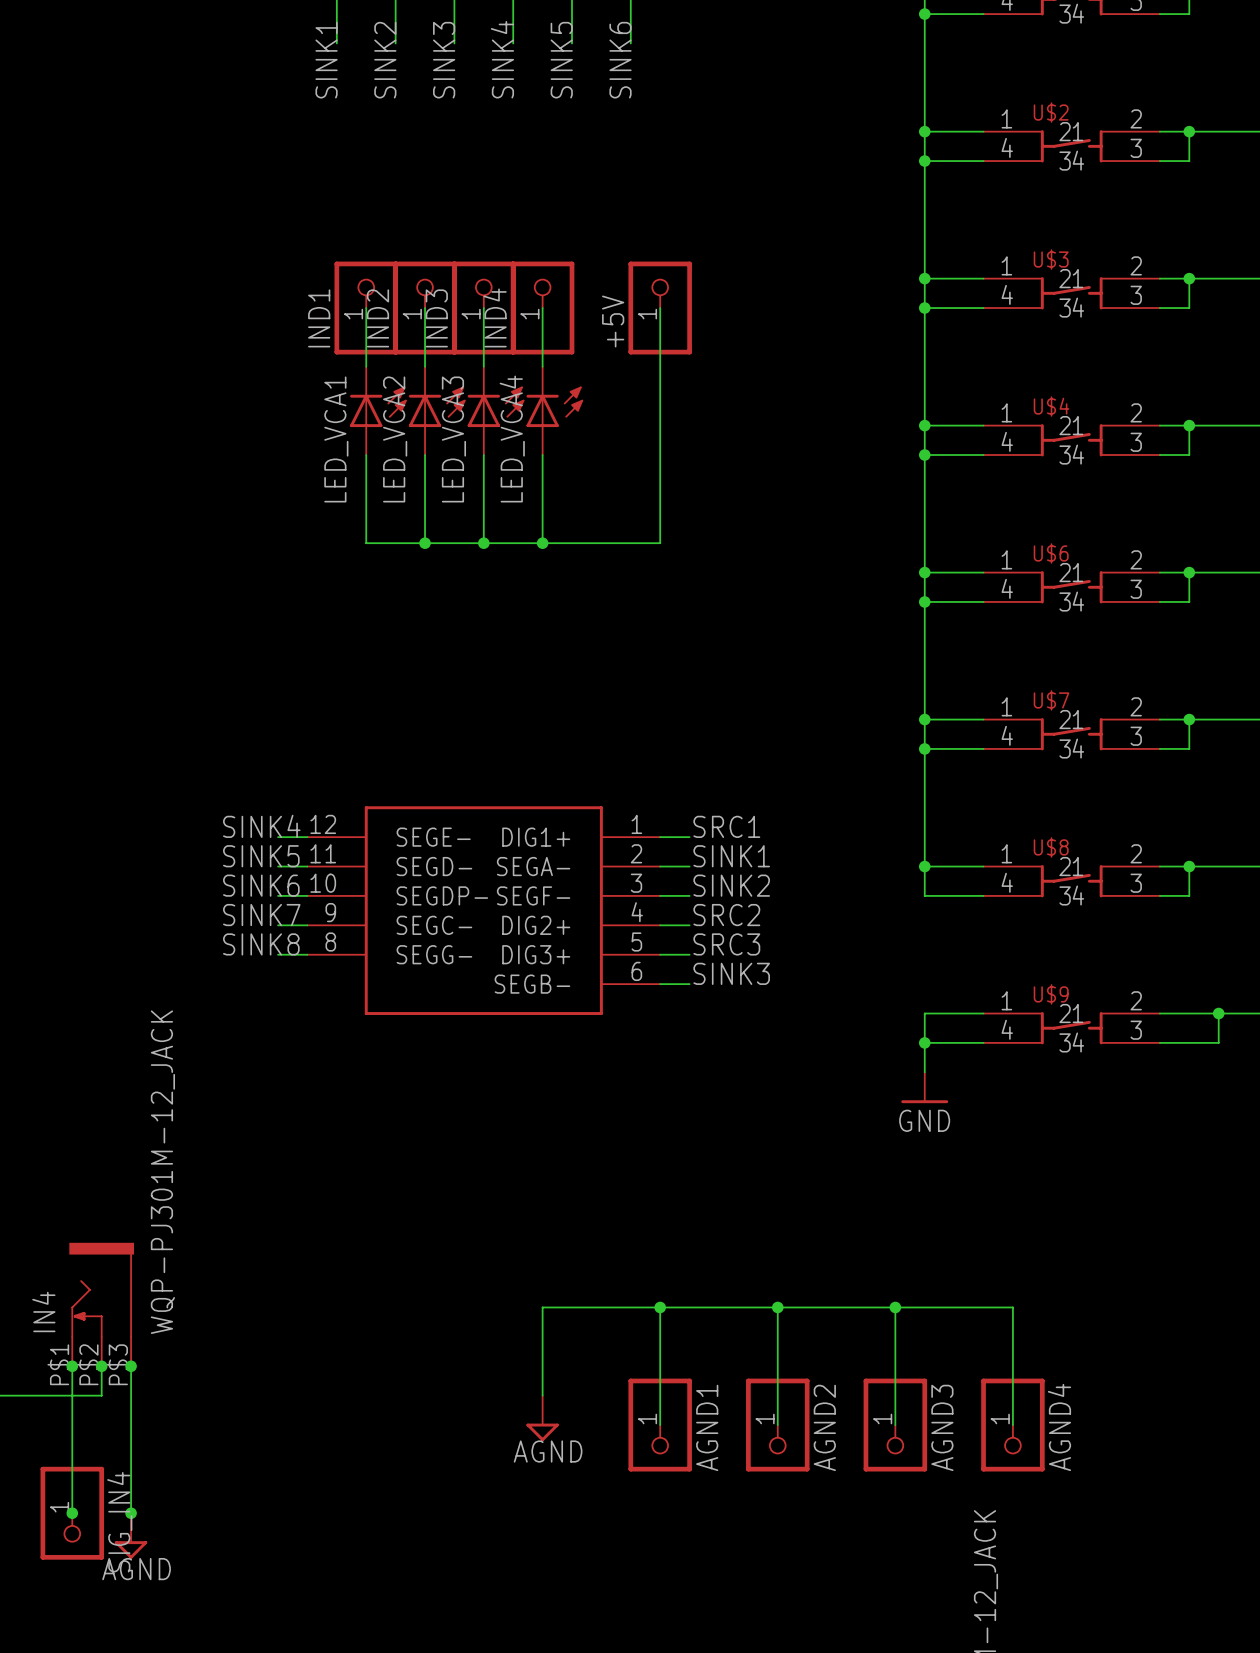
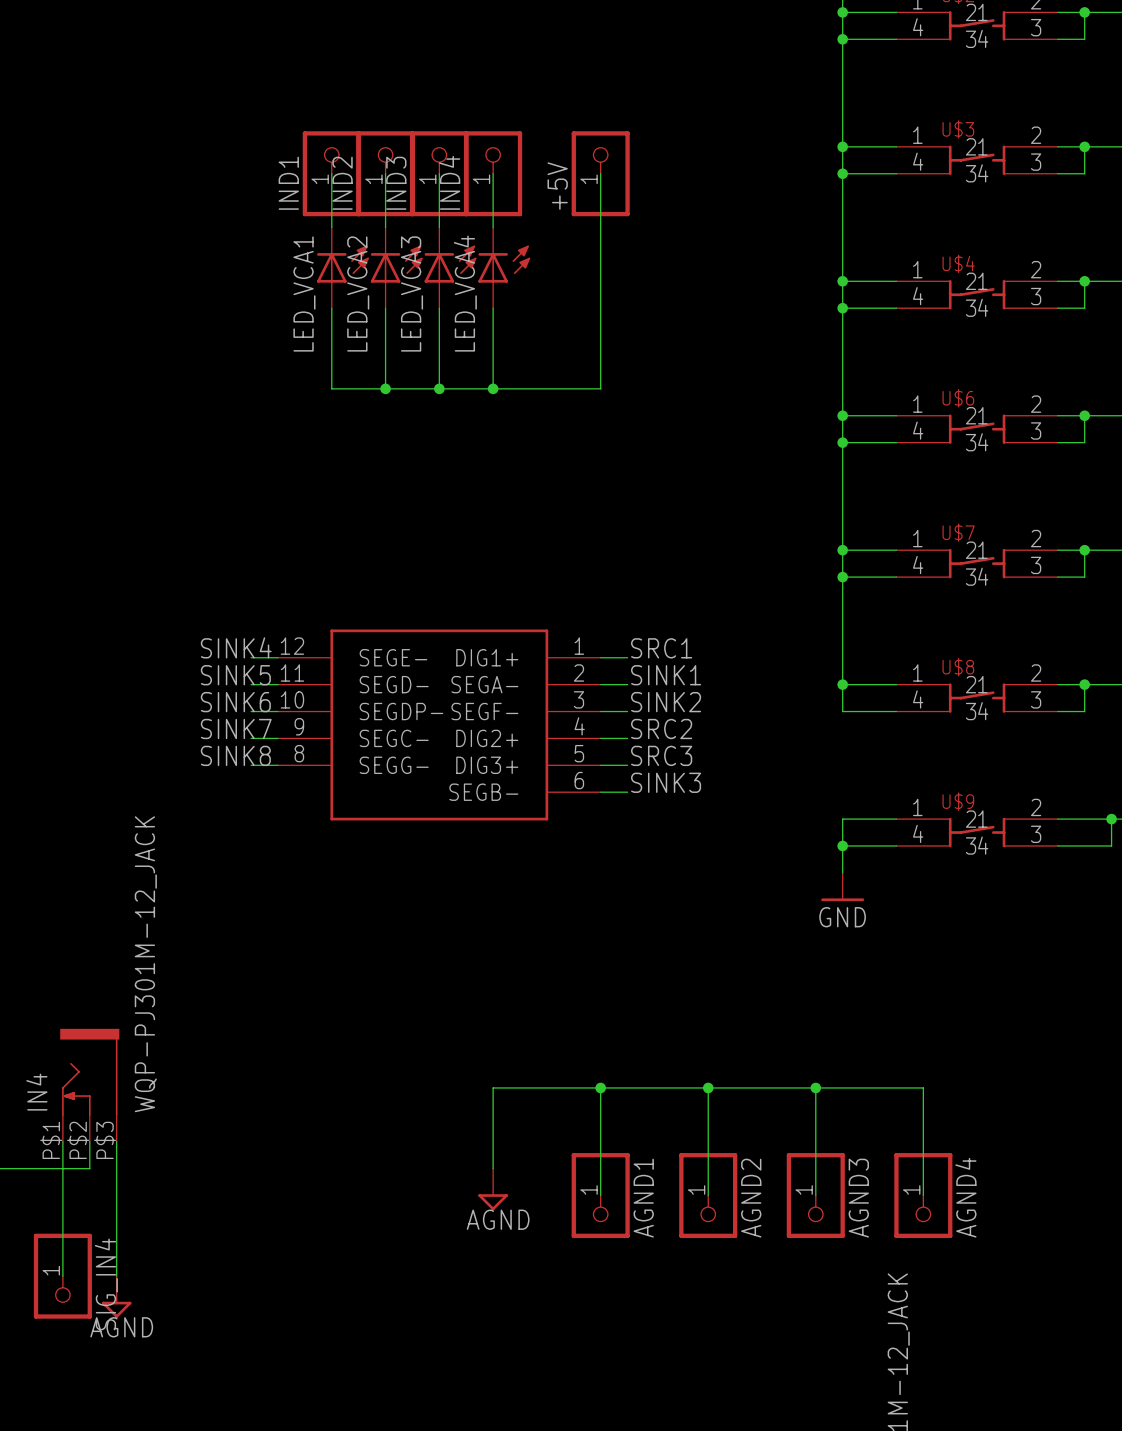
junction: (72, 1366) -> none
junction: (101, 1366) -> none
junction: (131, 1366) -> none
junction: (72, 1513) -> none
junction: (131, 1513) -> none

